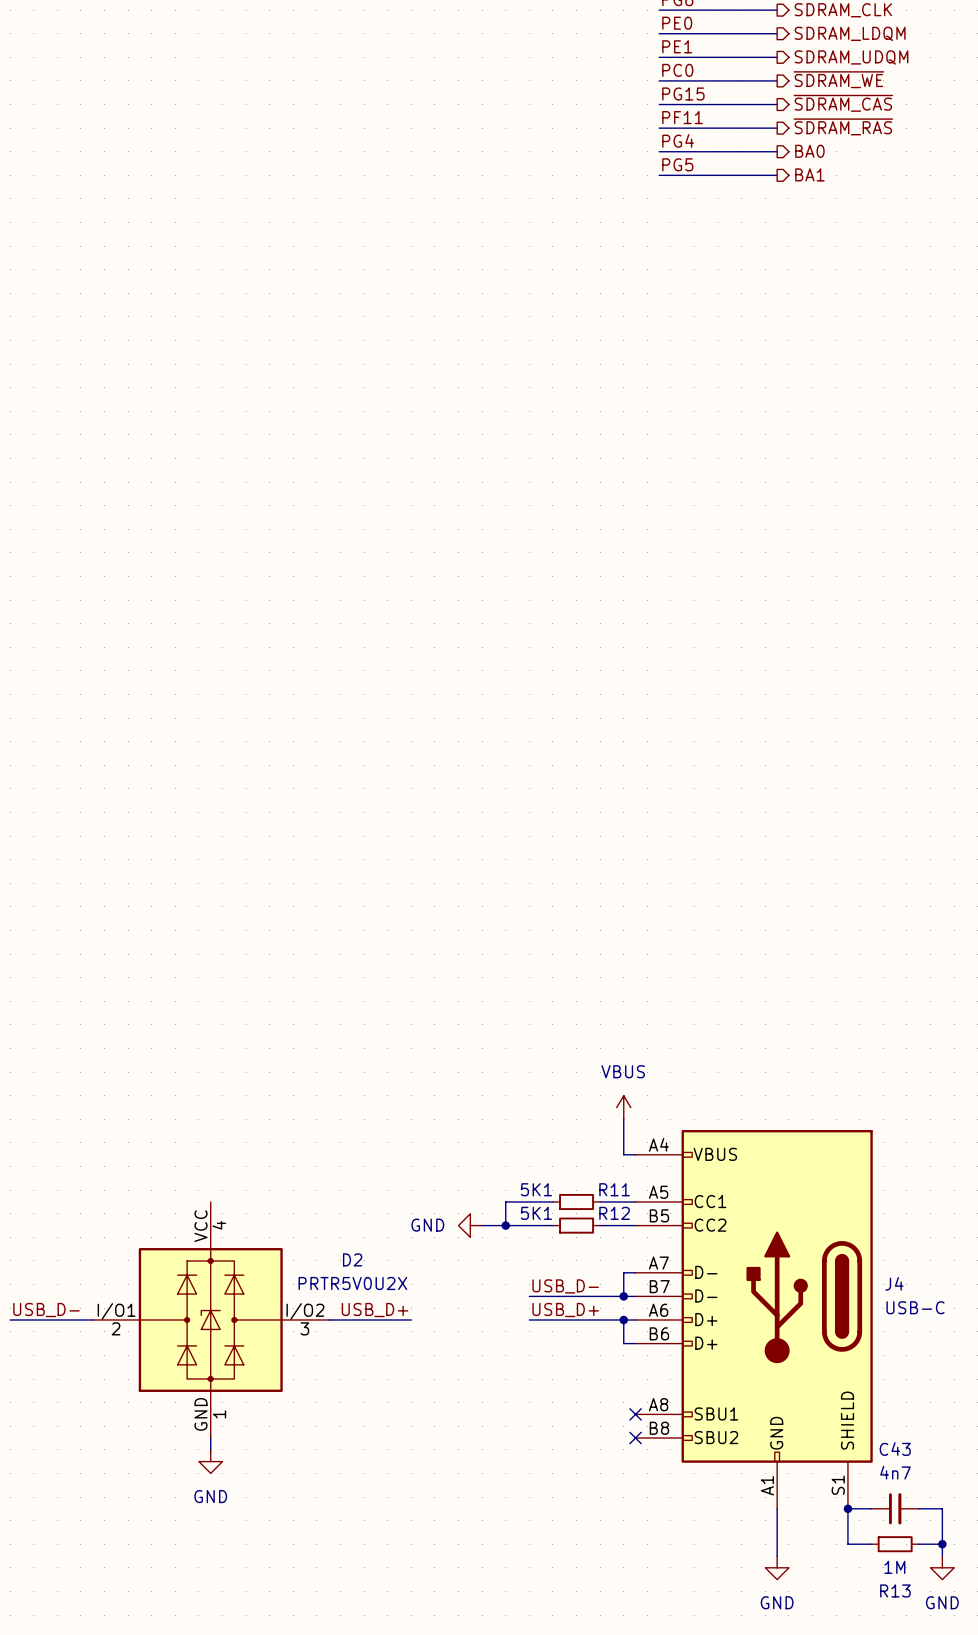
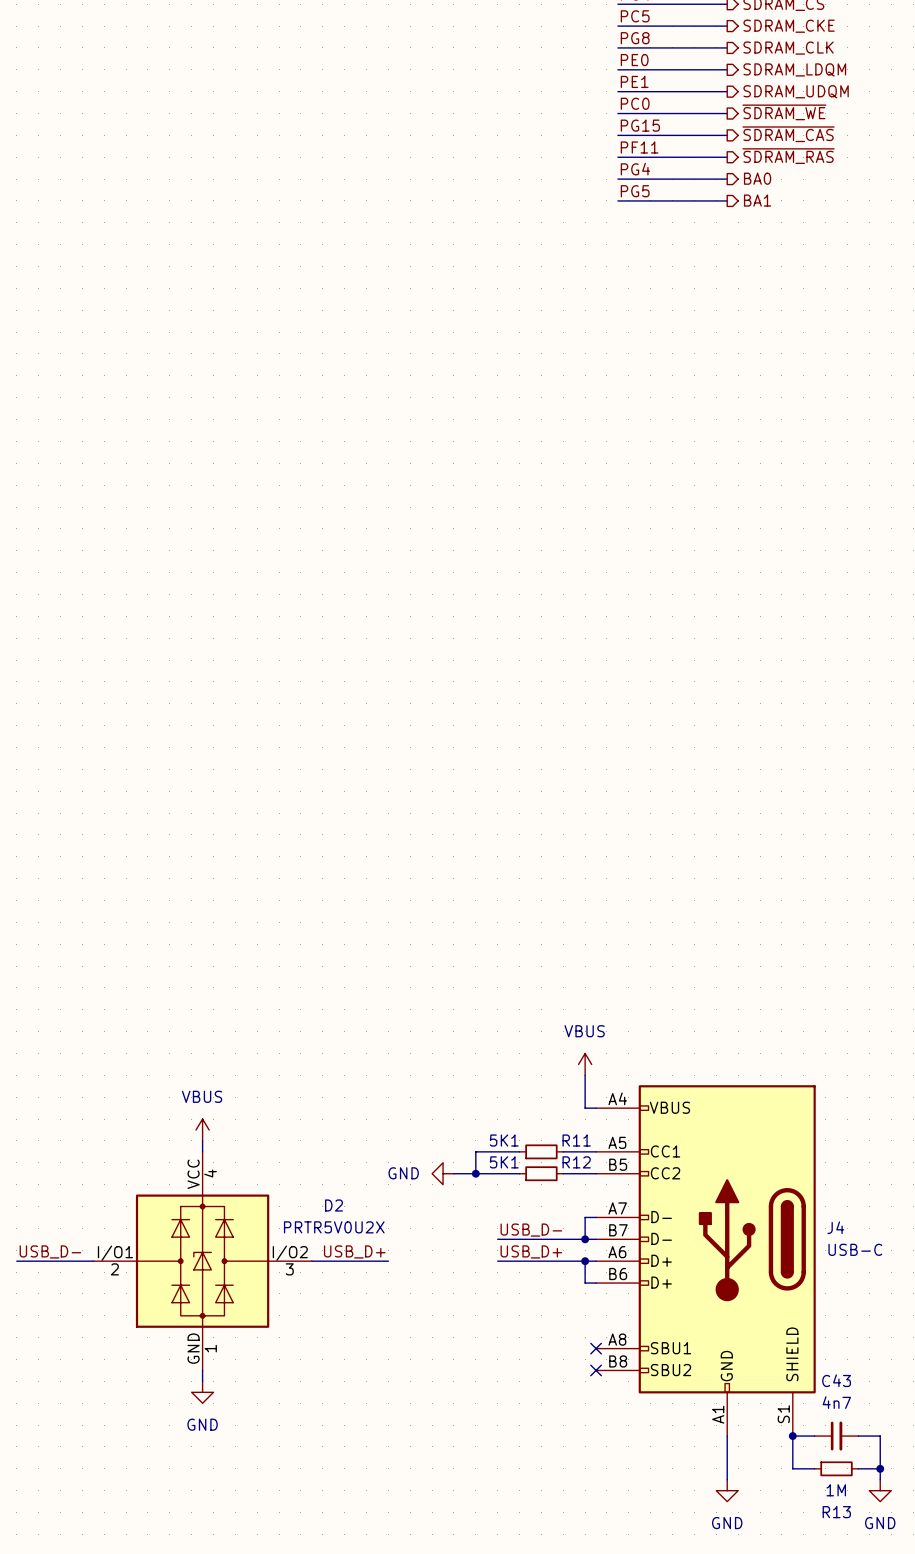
power symbol: none -> VBUS (202, 1130)
wire: none -> (202, 1140) (202, 1151)

